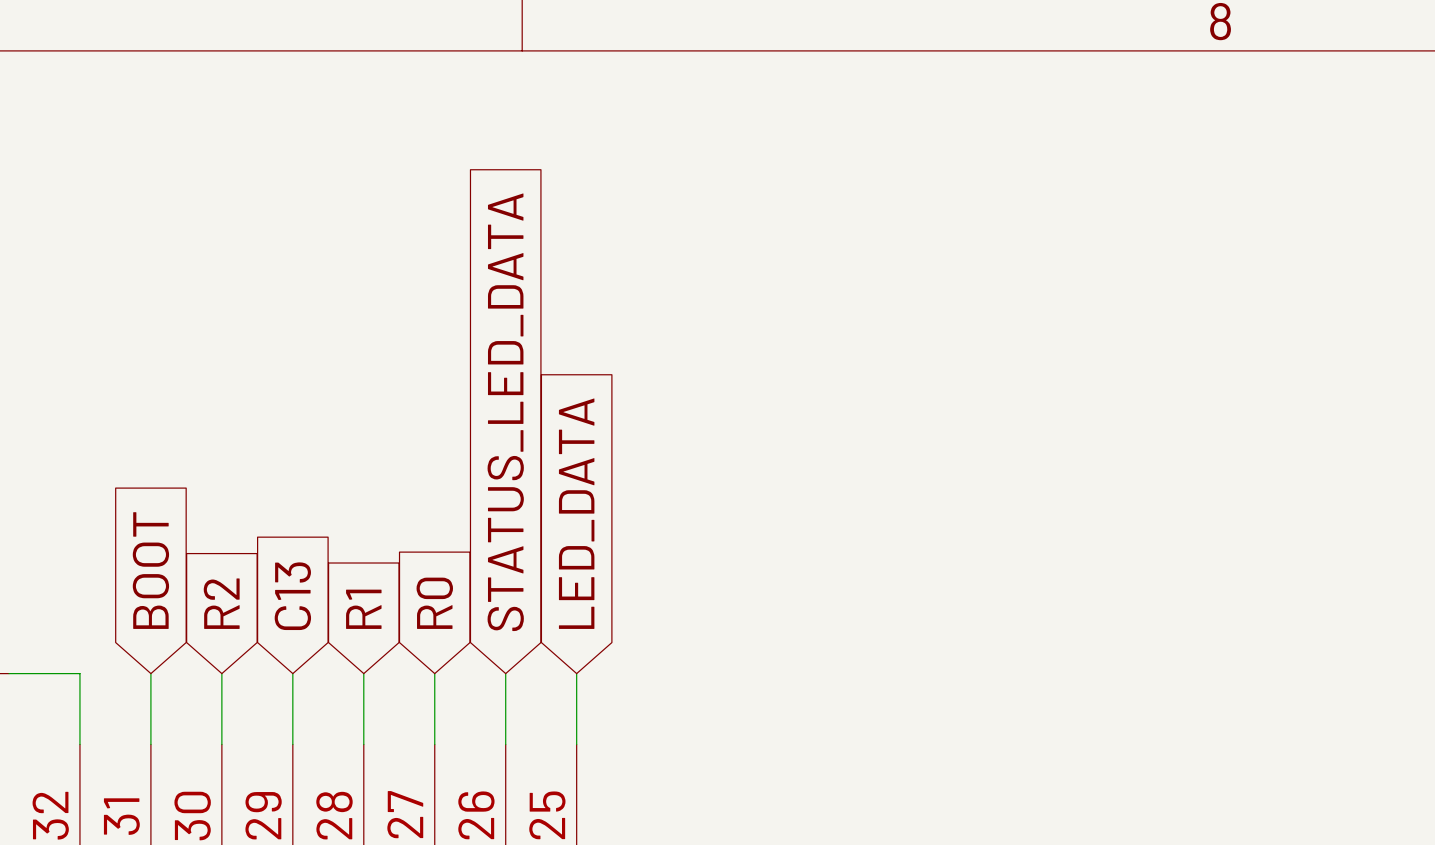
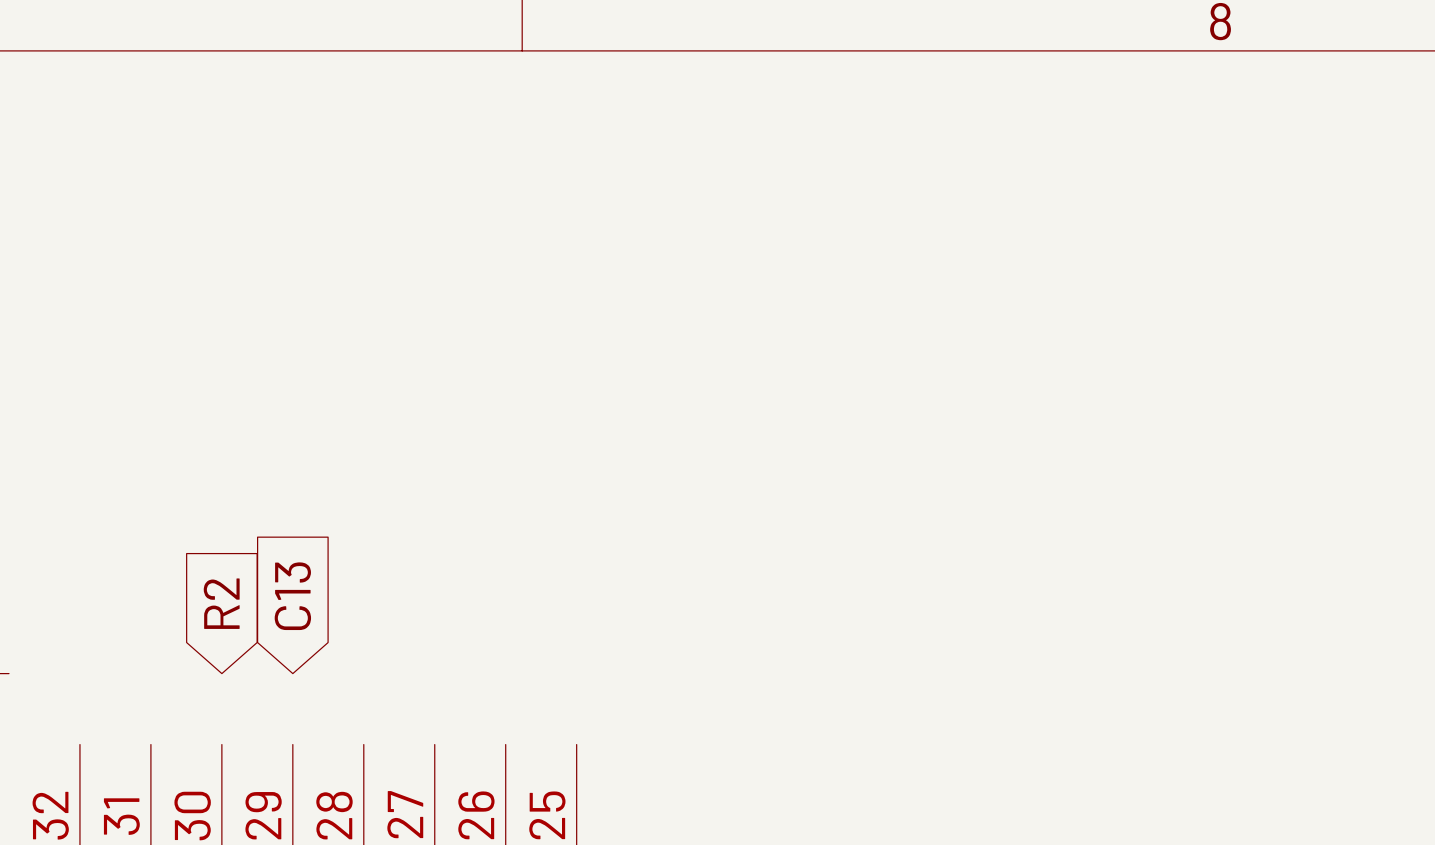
global label: STATUS_LED_DATA (505, 412) -> none
global label: LED_DATA (576, 513) -> none
global label: BOOT (150, 570) -> none
global label: R0 (434, 603) -> none
global label: R1 (363, 609) -> none
wire: (9, 673) (79, 673) (79, 744) -> none
wire: (150, 673) (150, 744) -> none
wire: (221, 673) (221, 744) -> none
wire: (292, 673) (292, 744) -> none
wire: (363, 673) (363, 744) -> none
wire: (434, 673) (434, 744) -> none
wire: (505, 673) (505, 744) -> none
wire: (576, 673) (576, 744) -> none

